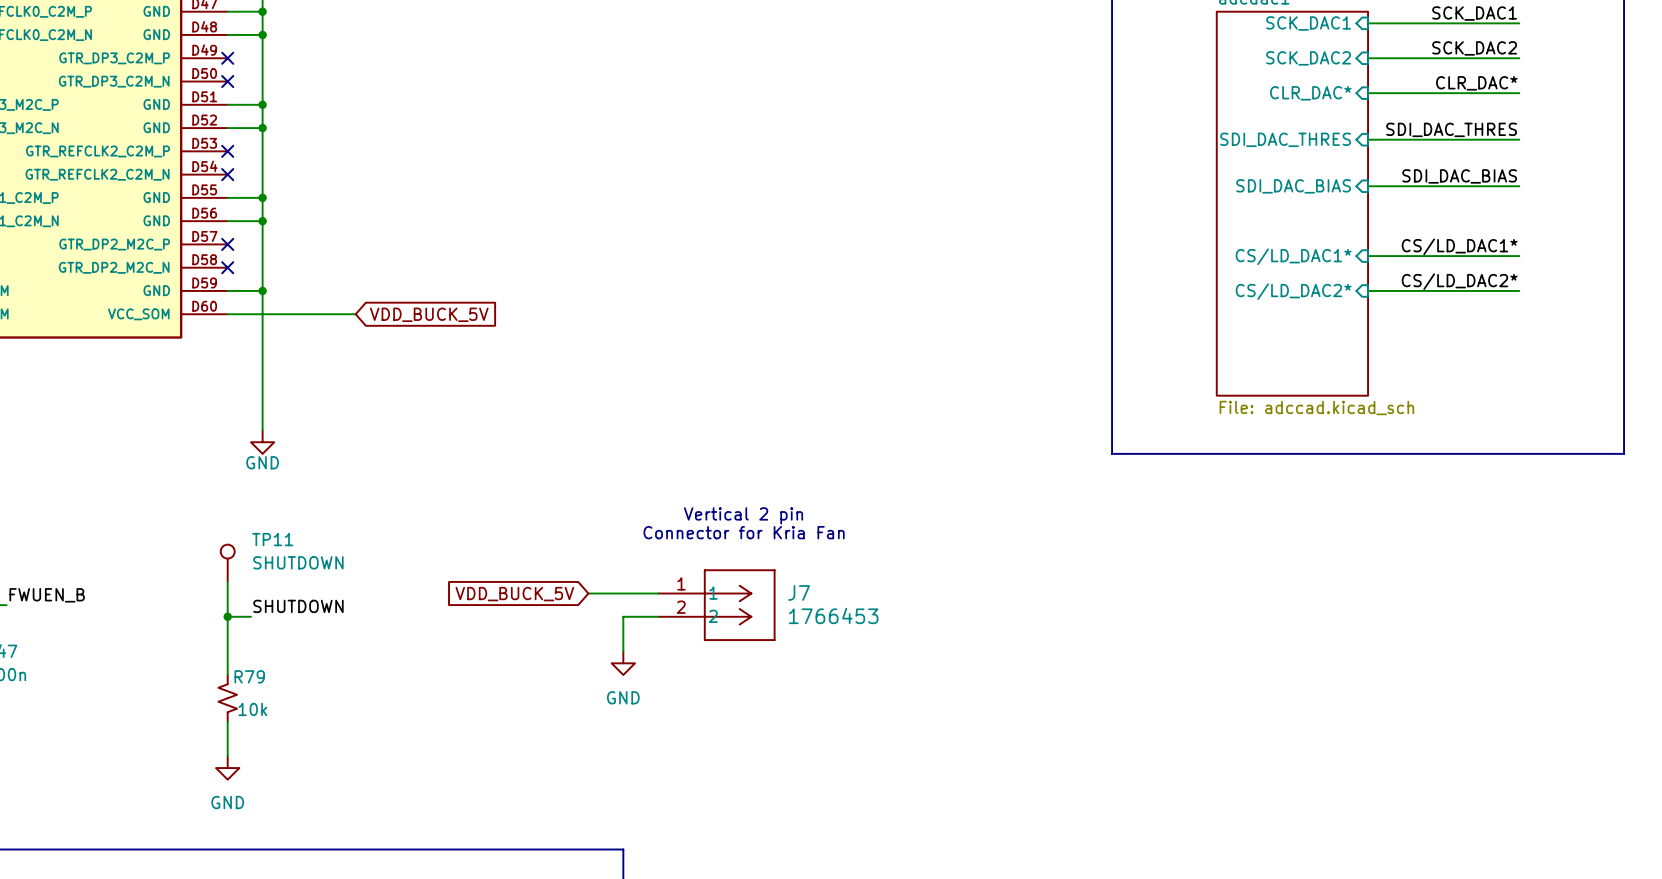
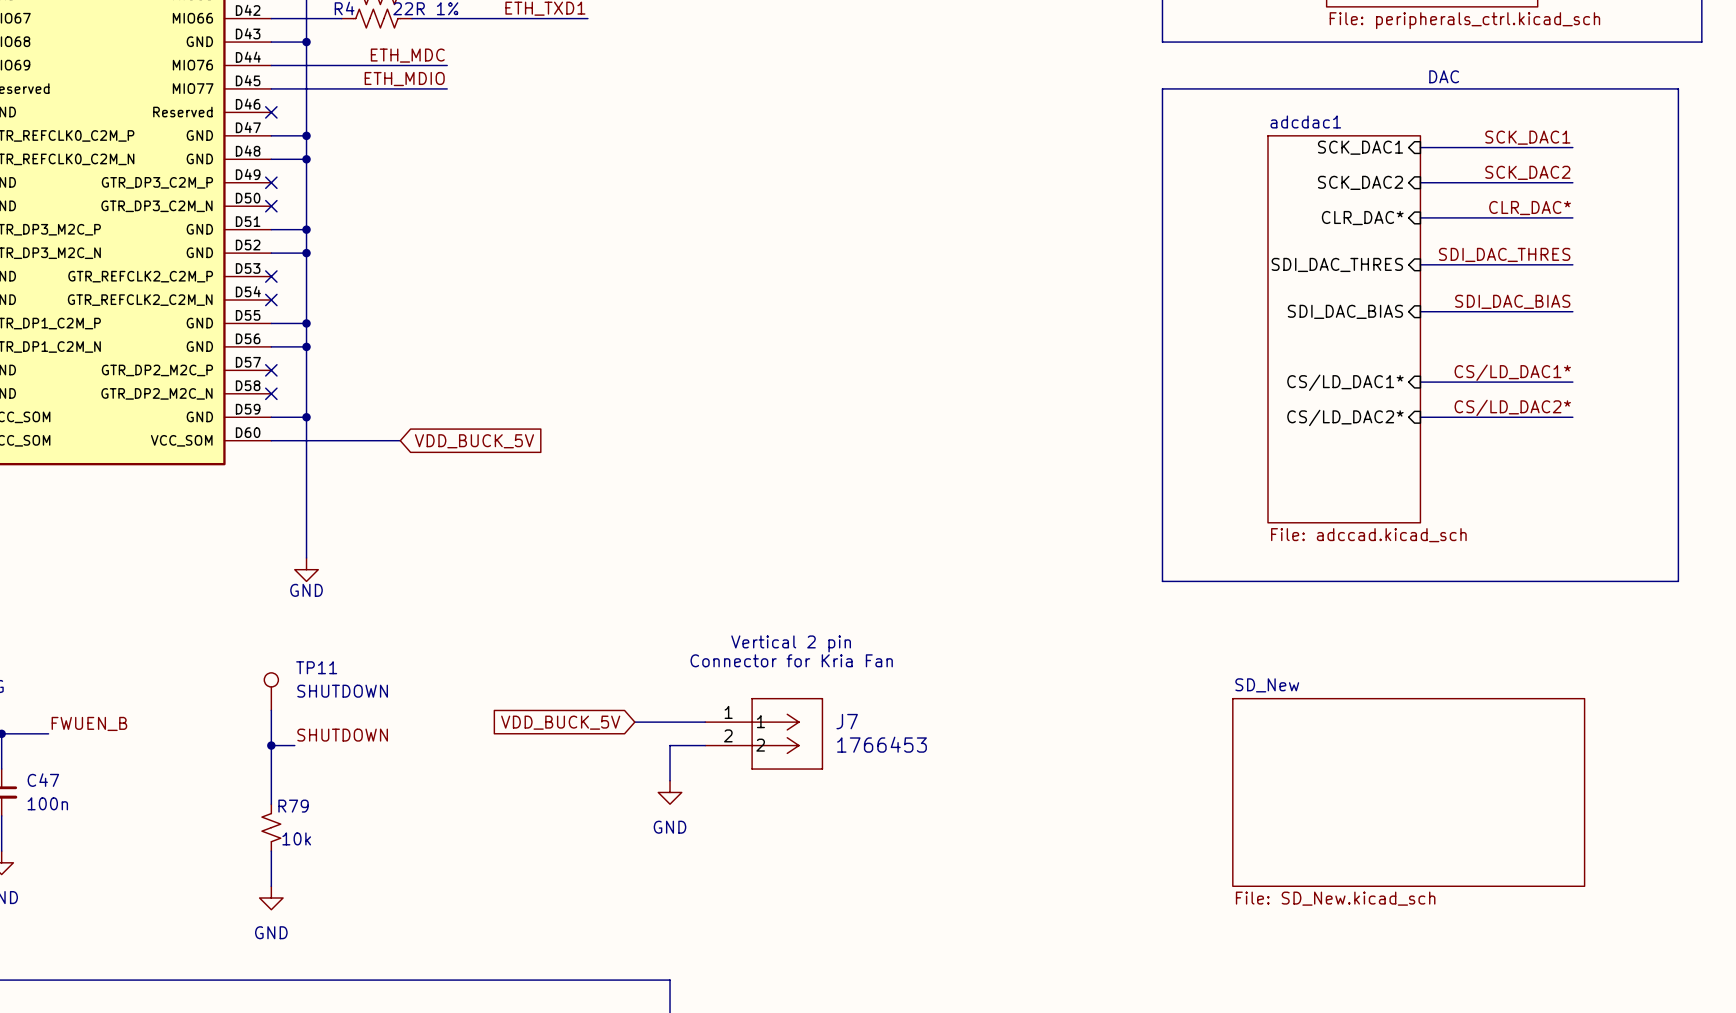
sheet SD_New: none -> File: SD_New.kicad_sch (1408, 792)

